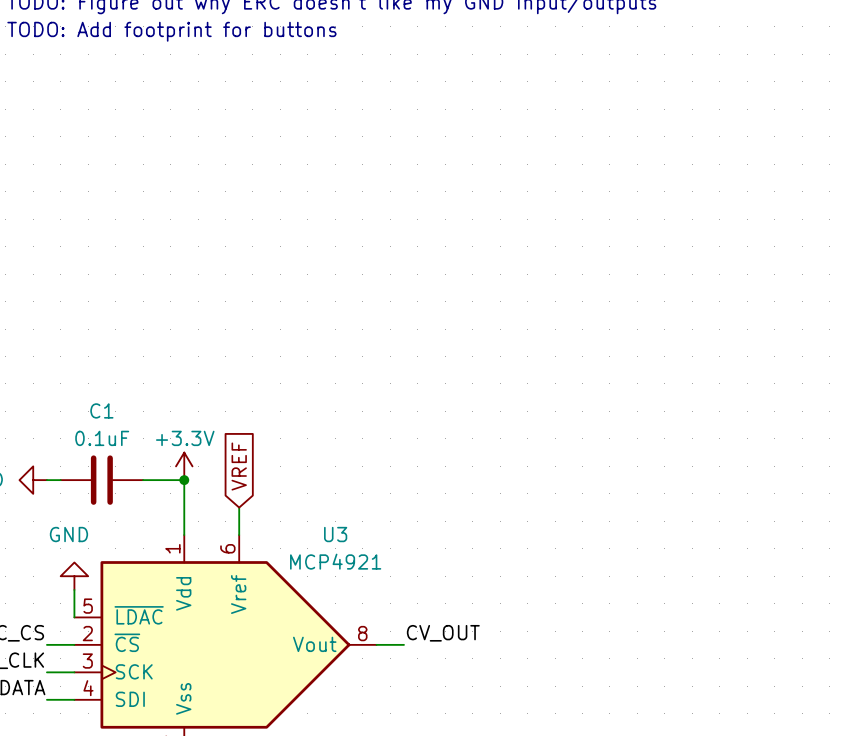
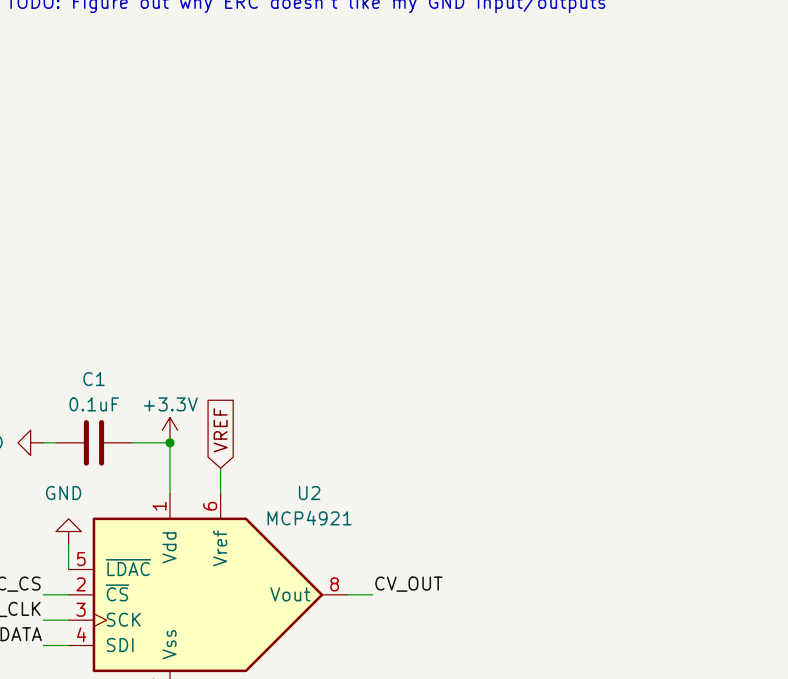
text: TODO: Add footprint for buttons (171, 31) -> none
U3 name: U3 (335, 534) -> U2 (309, 493)

